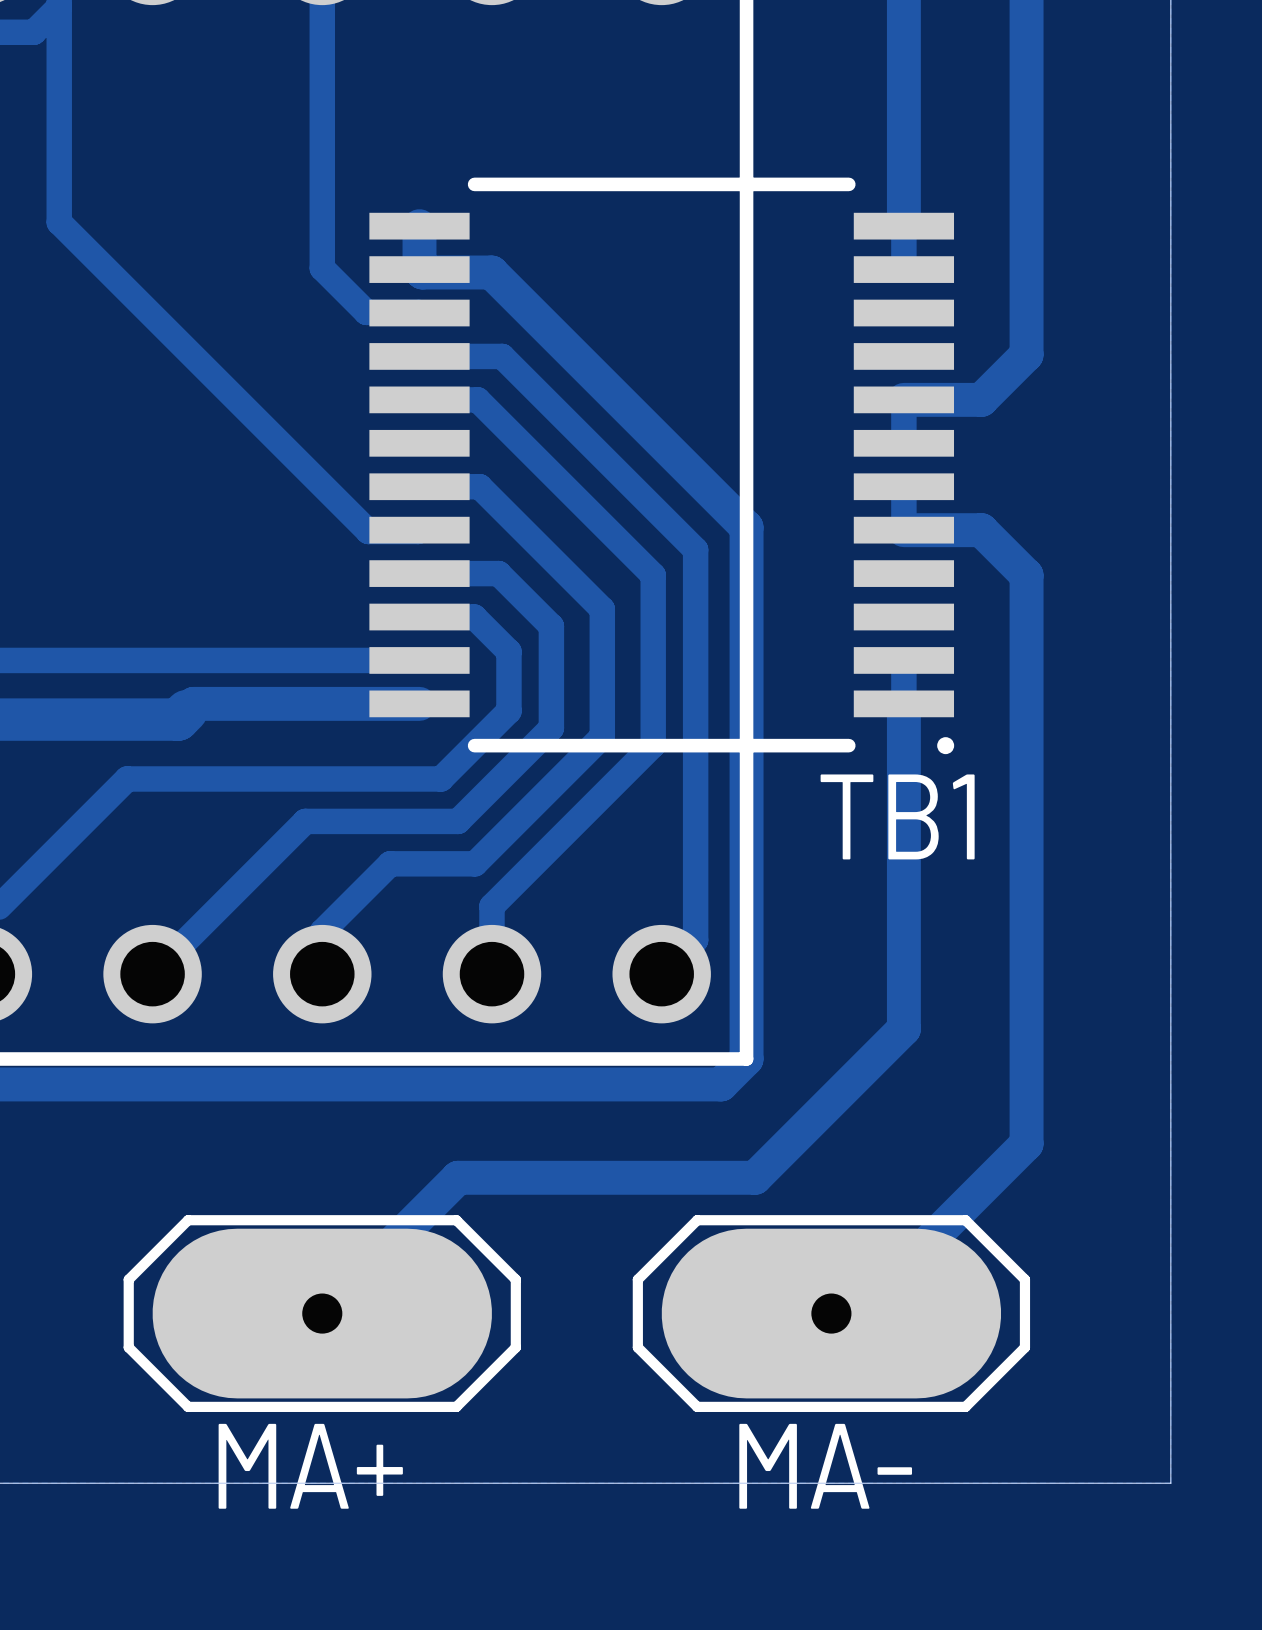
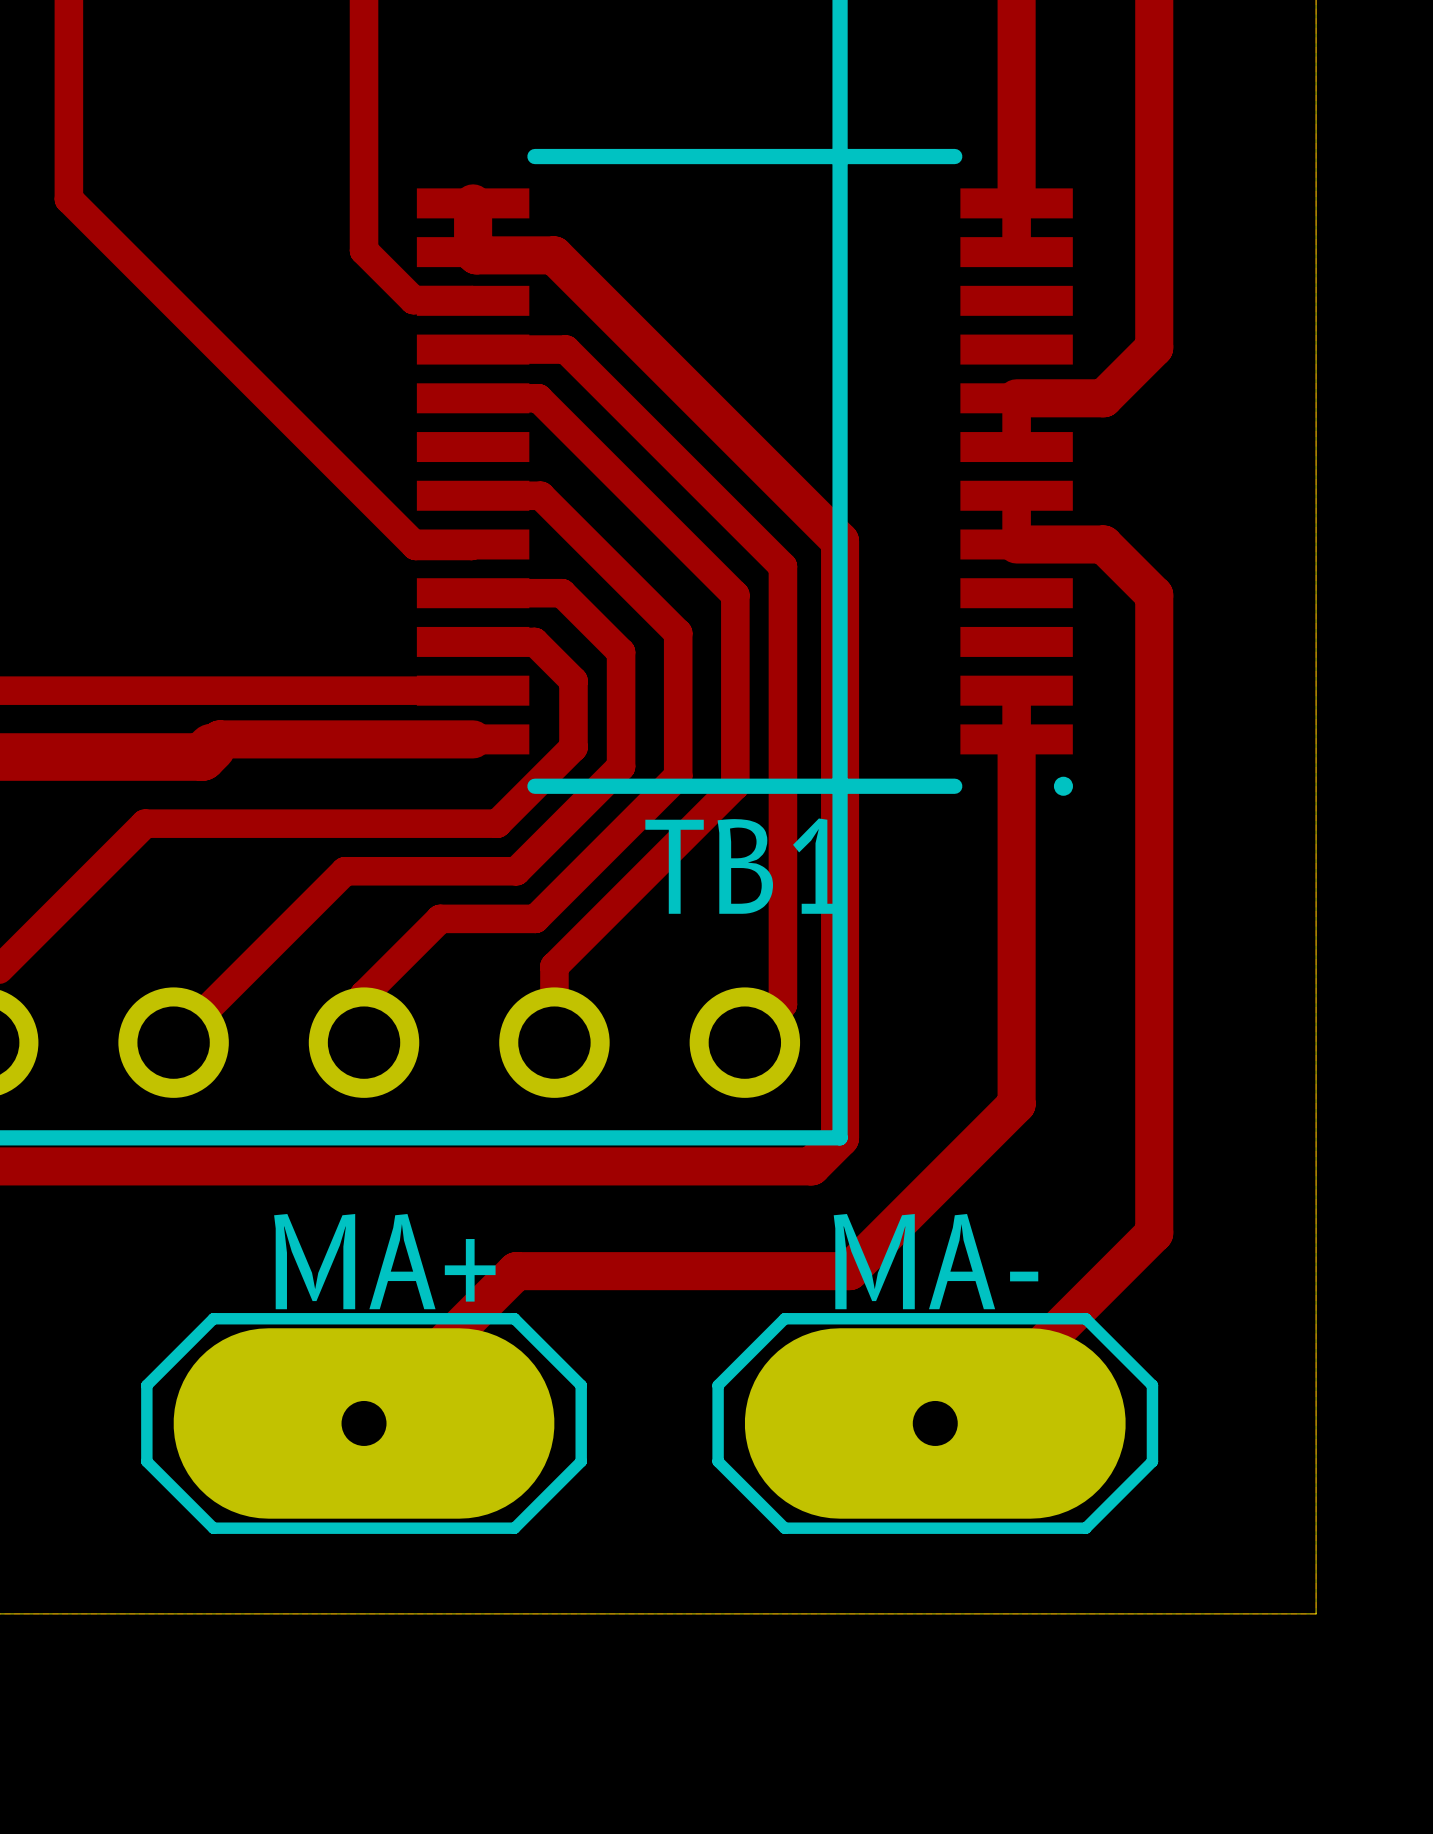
TB1 name position: TB1 (897, 816) -> TB1 (743, 866)
MA+ name position: MA+ (310, 1466) -> MA+ (384, 1261)
MA- name position: MA- (825, 1466) -> MA- (935, 1261)

